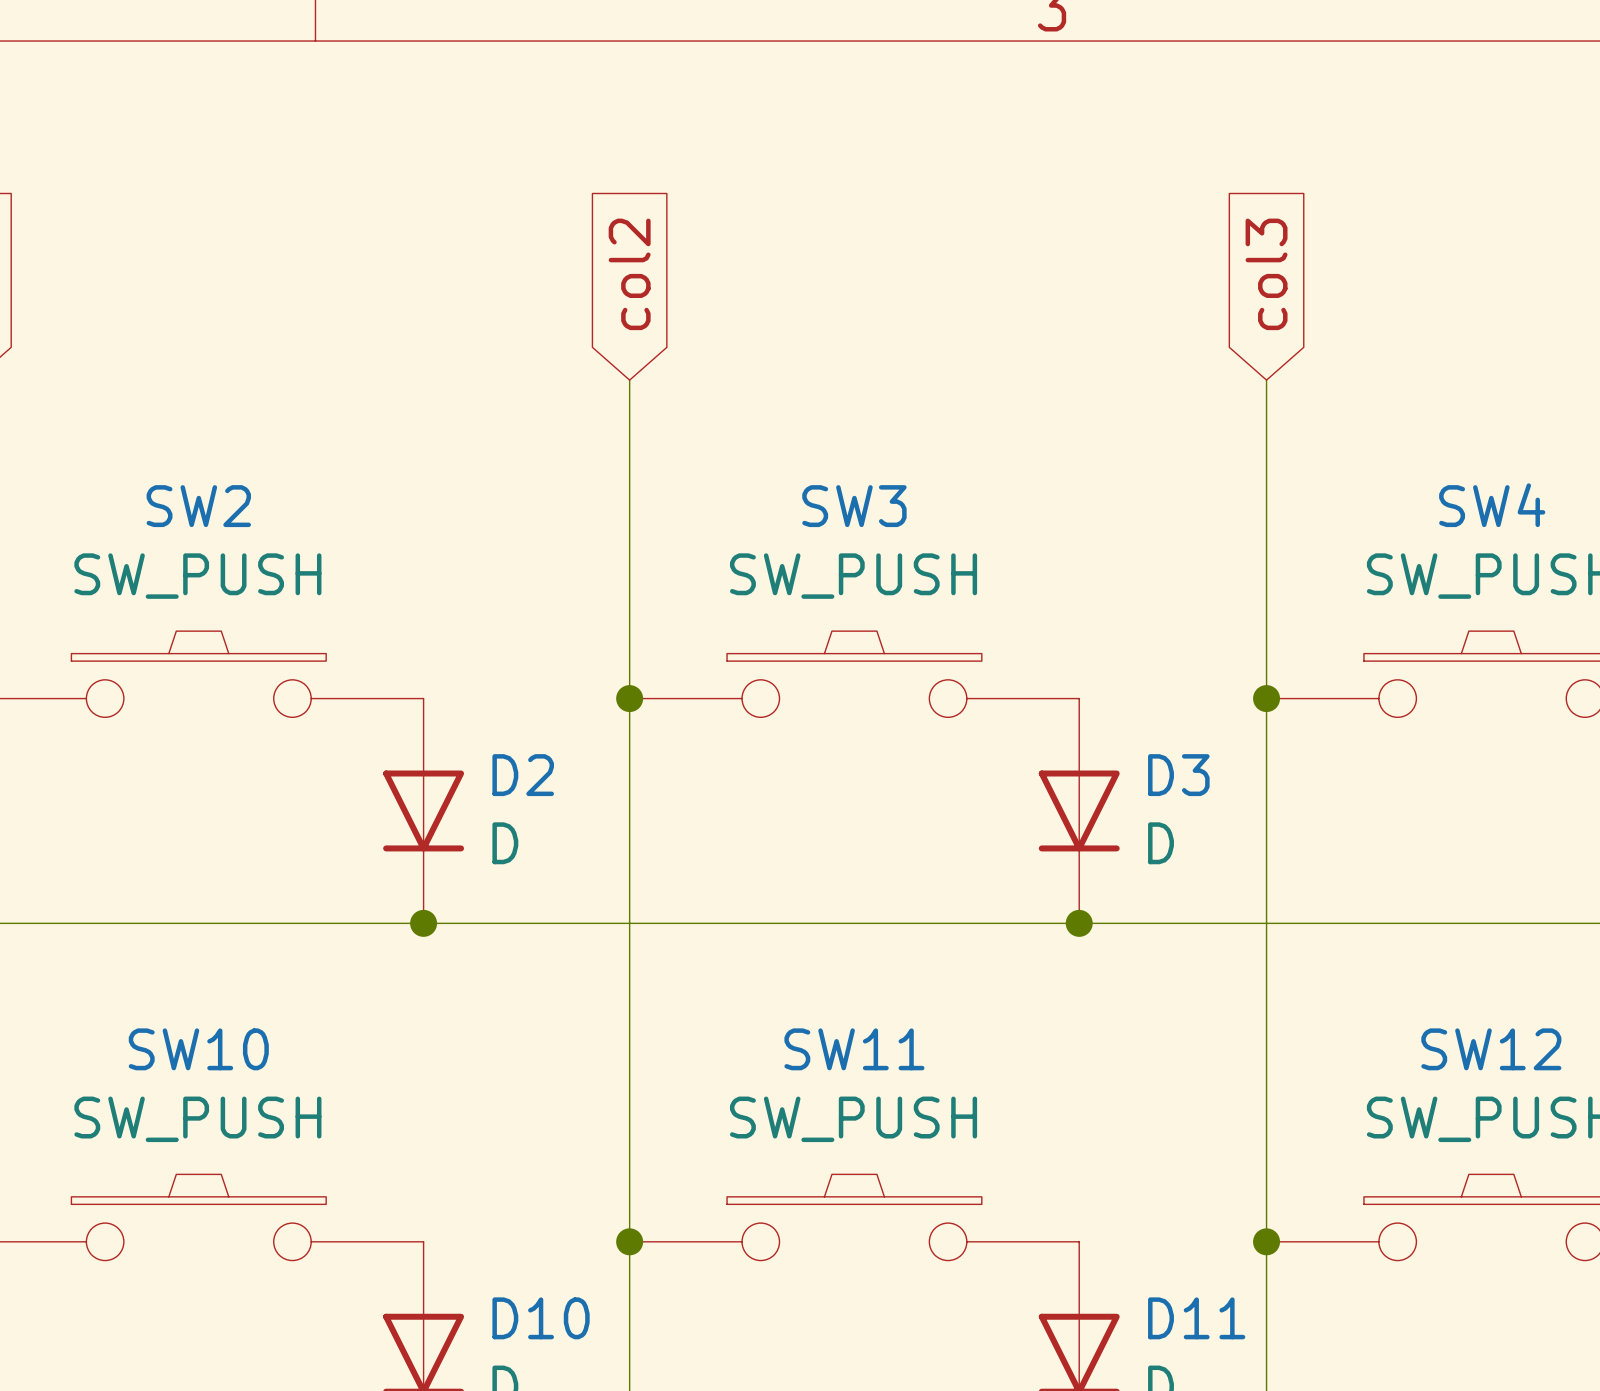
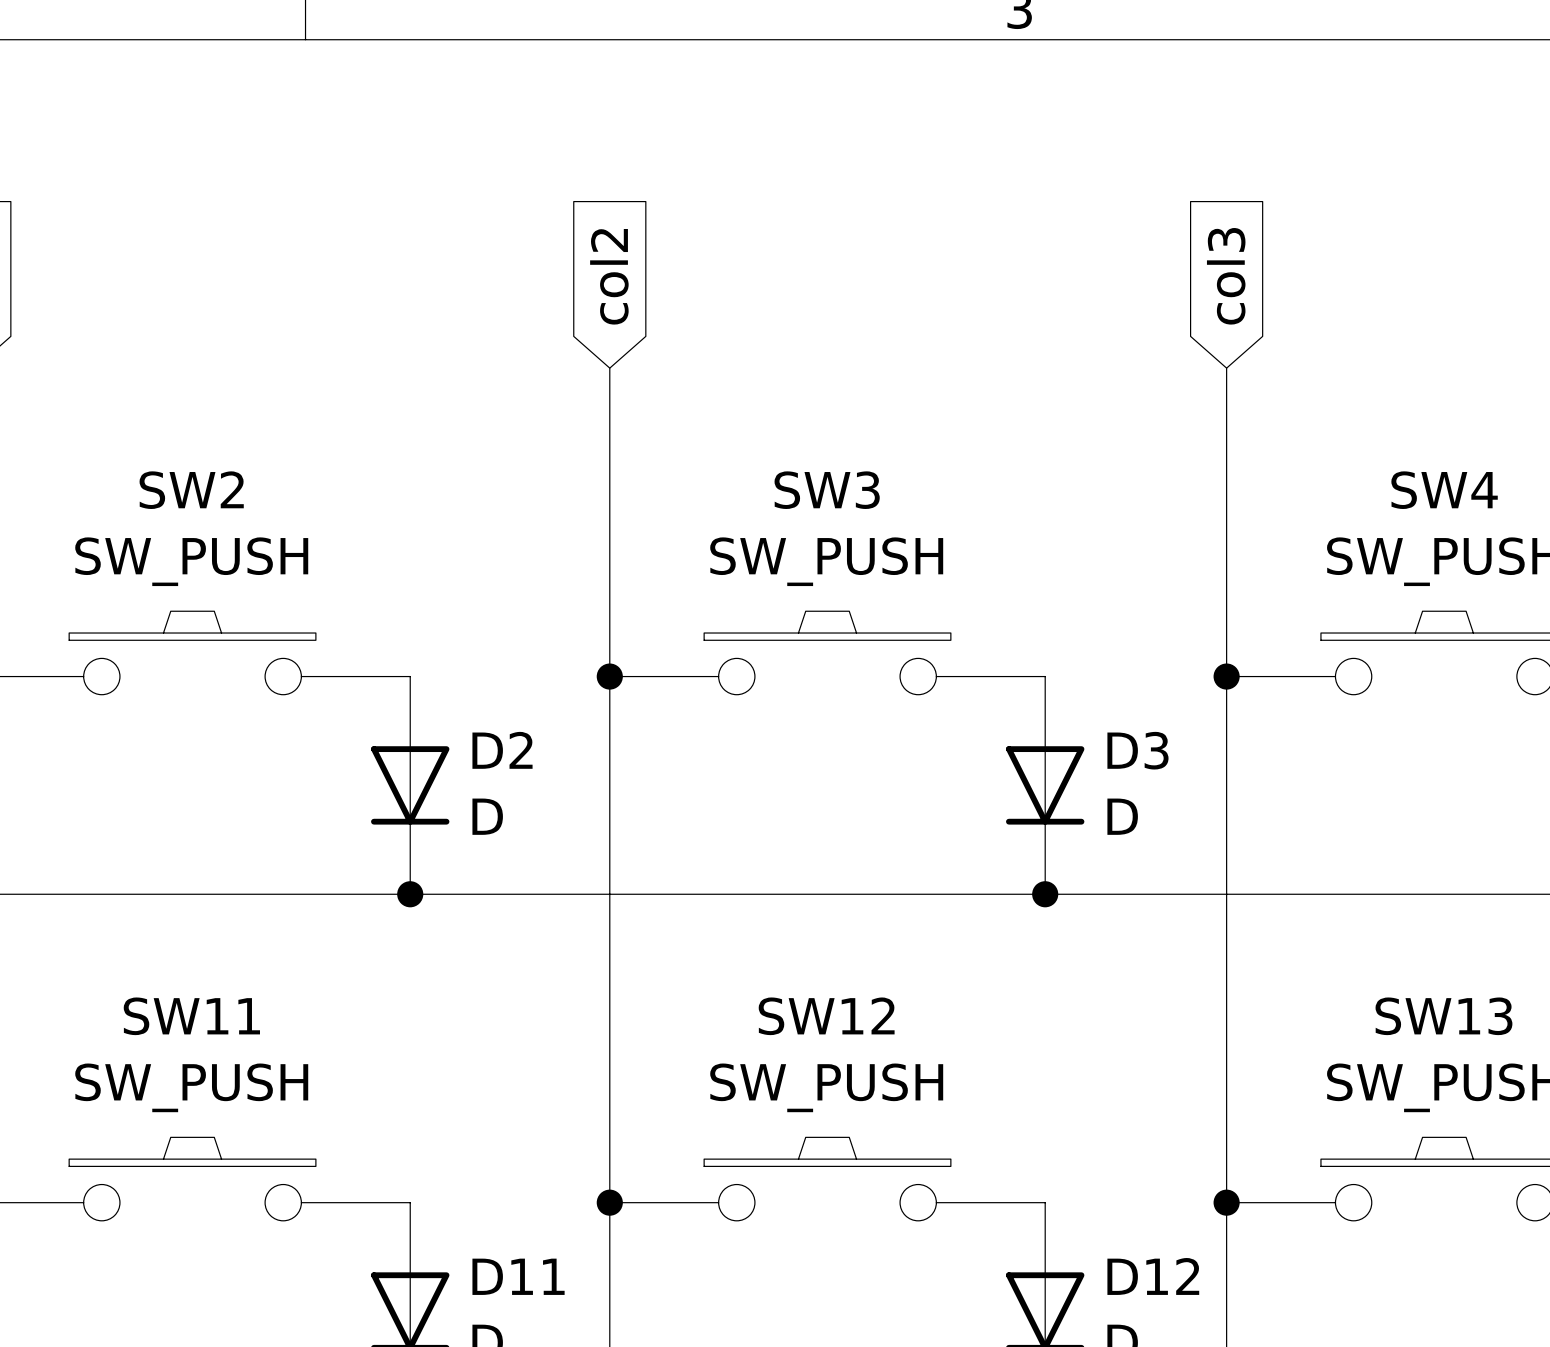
SW10 name: SW10 (198, 1049) -> SW11 (191, 1016)
SW11 name: SW11 (854, 1049) -> SW12 (826, 1016)
SW12 name: SW12 (1491, 1049) -> SW13 (1443, 1016)
D10 name: D10 (541, 1318) -> D11 (518, 1276)
D11 name: D11 (1196, 1318) -> D12 (1153, 1276)

